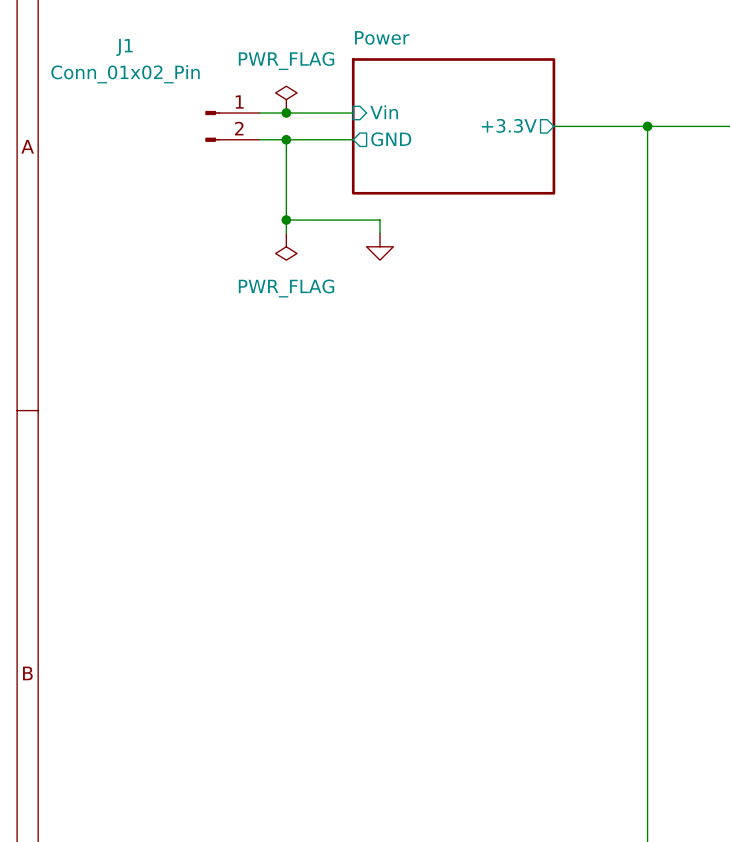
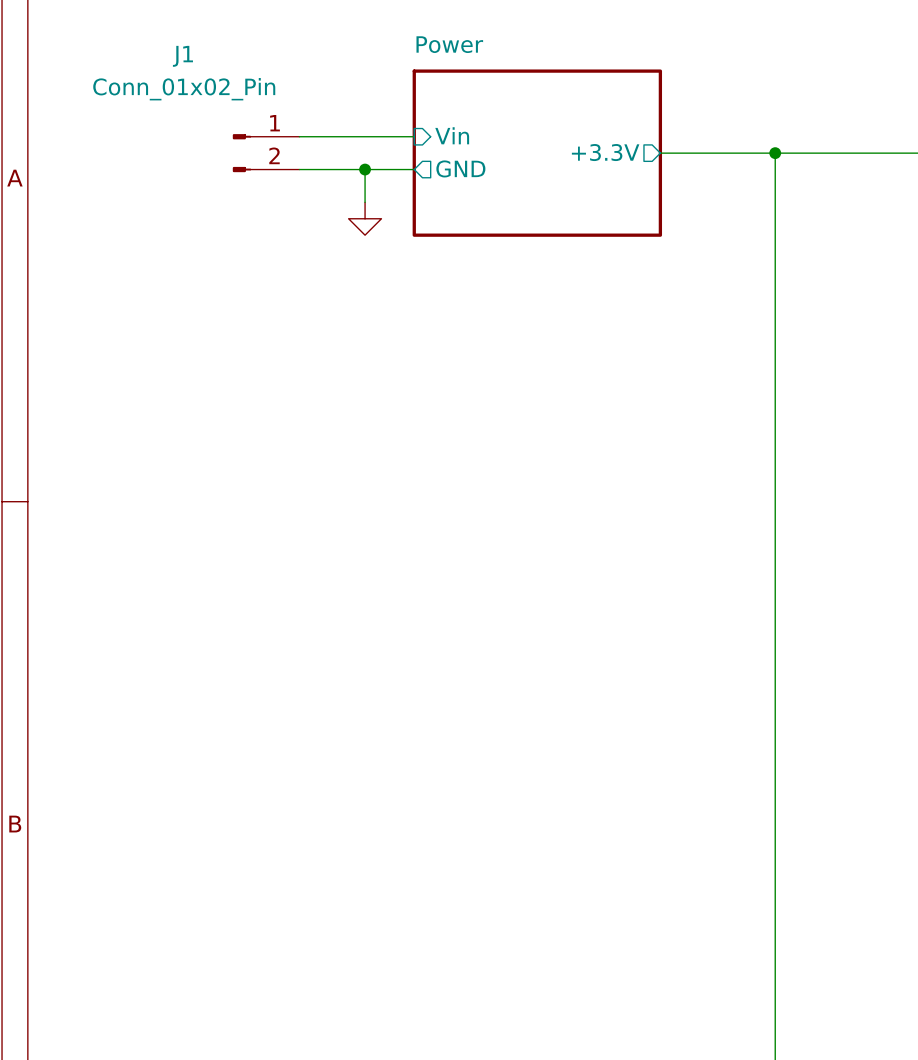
J1 name position: J1 (124, 47) -> J1 (182, 56)
J1 value position: Conn_01x02_Pin (125, 74) -> Conn_01x02_Pin (184, 89)
power symbol: PWR_FLAG (286, 99) -> none
junction: (286, 113) -> none
wire: (286, 139) (286, 233) -> none
junction: (286, 139) -> none
wire: none -> (365, 169) (365, 202)
junction: none -> (365, 169)
wire: (286, 220) (379, 220) (379, 233) -> none
junction: (286, 220) -> none
power symbol: PWR_FLAG (286, 246) -> none
power symbol position: (379, 246) -> (365, 218)

